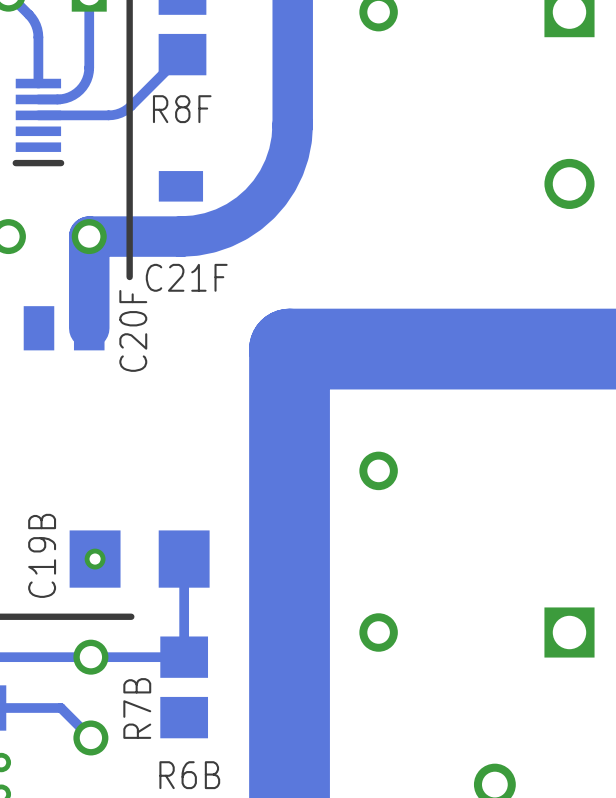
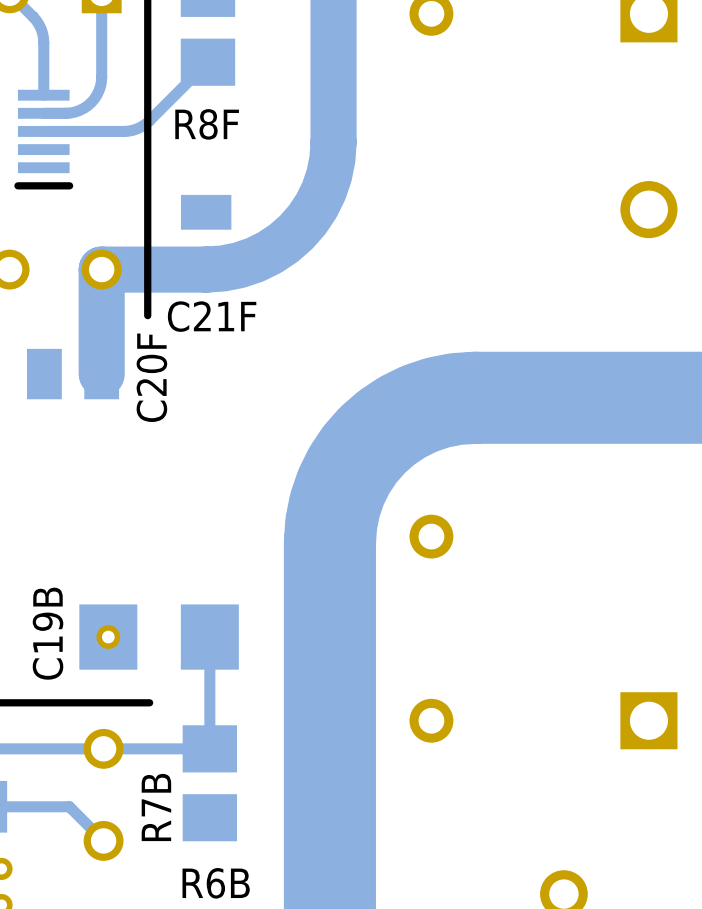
track: (416, 349) (289, 349) (289, 476) -> (474, 397) (437, 402) (419, 408) (386, 427) (372, 440) (349, 470) (340, 487) (331, 523) (329, 542)

